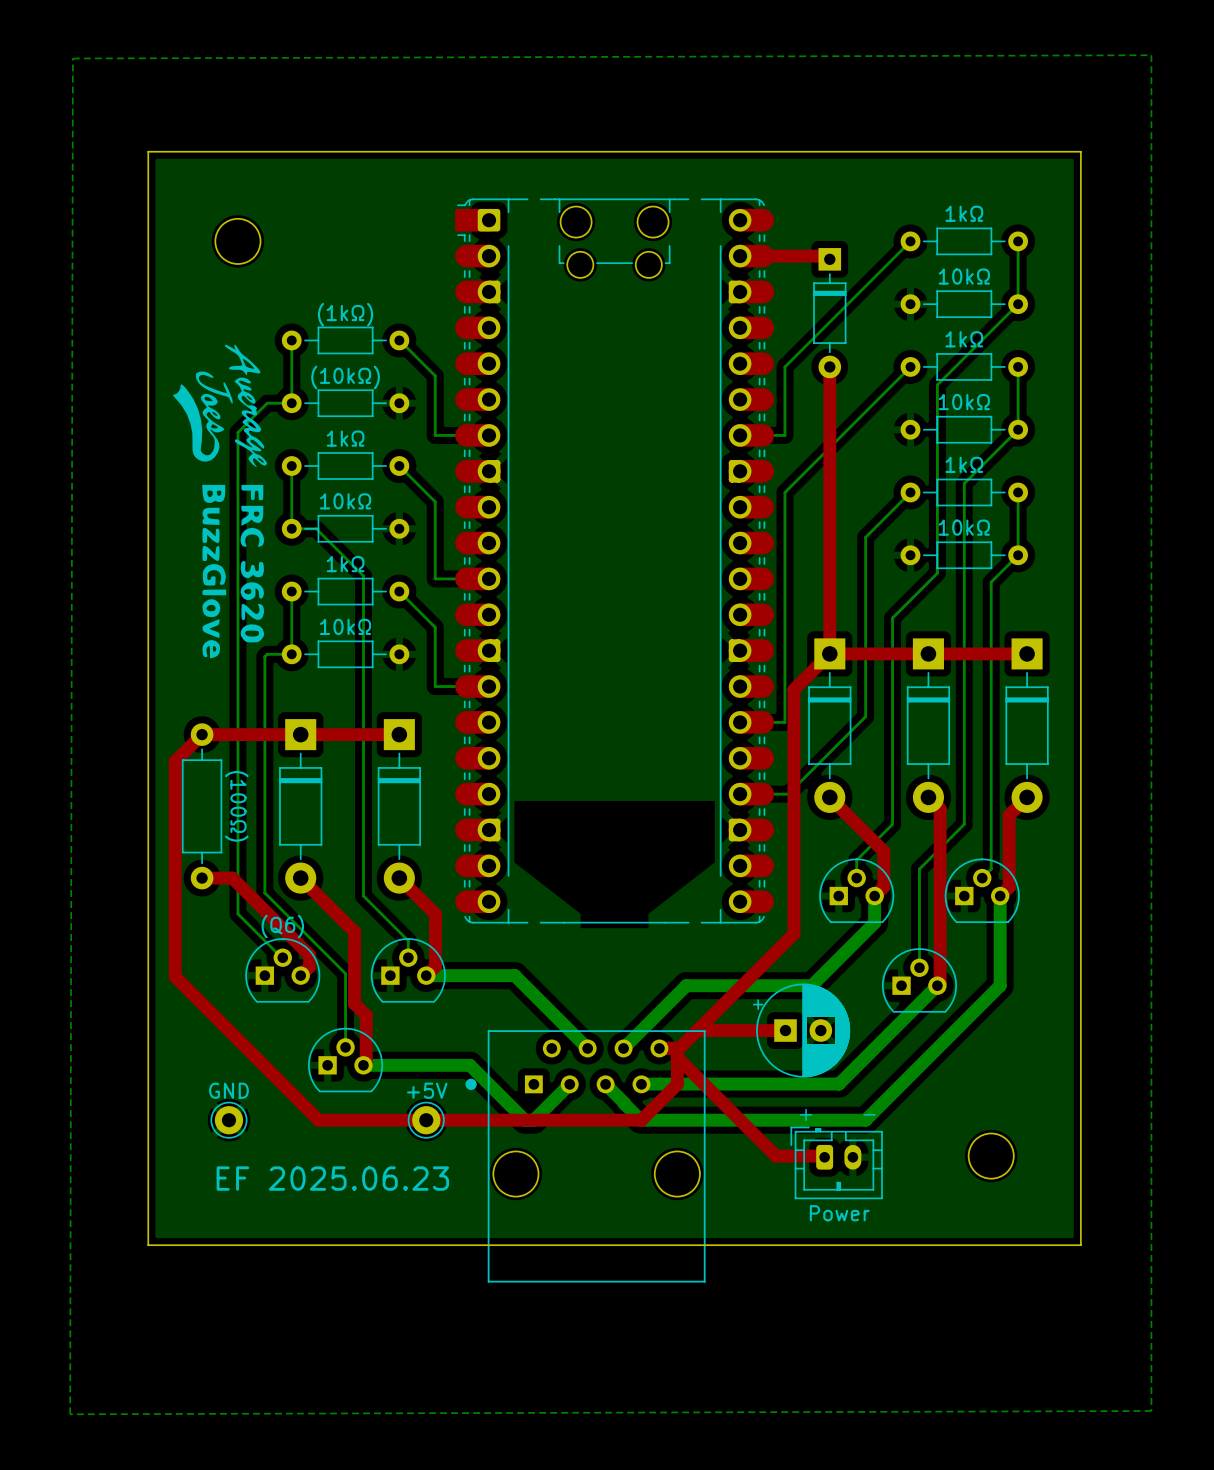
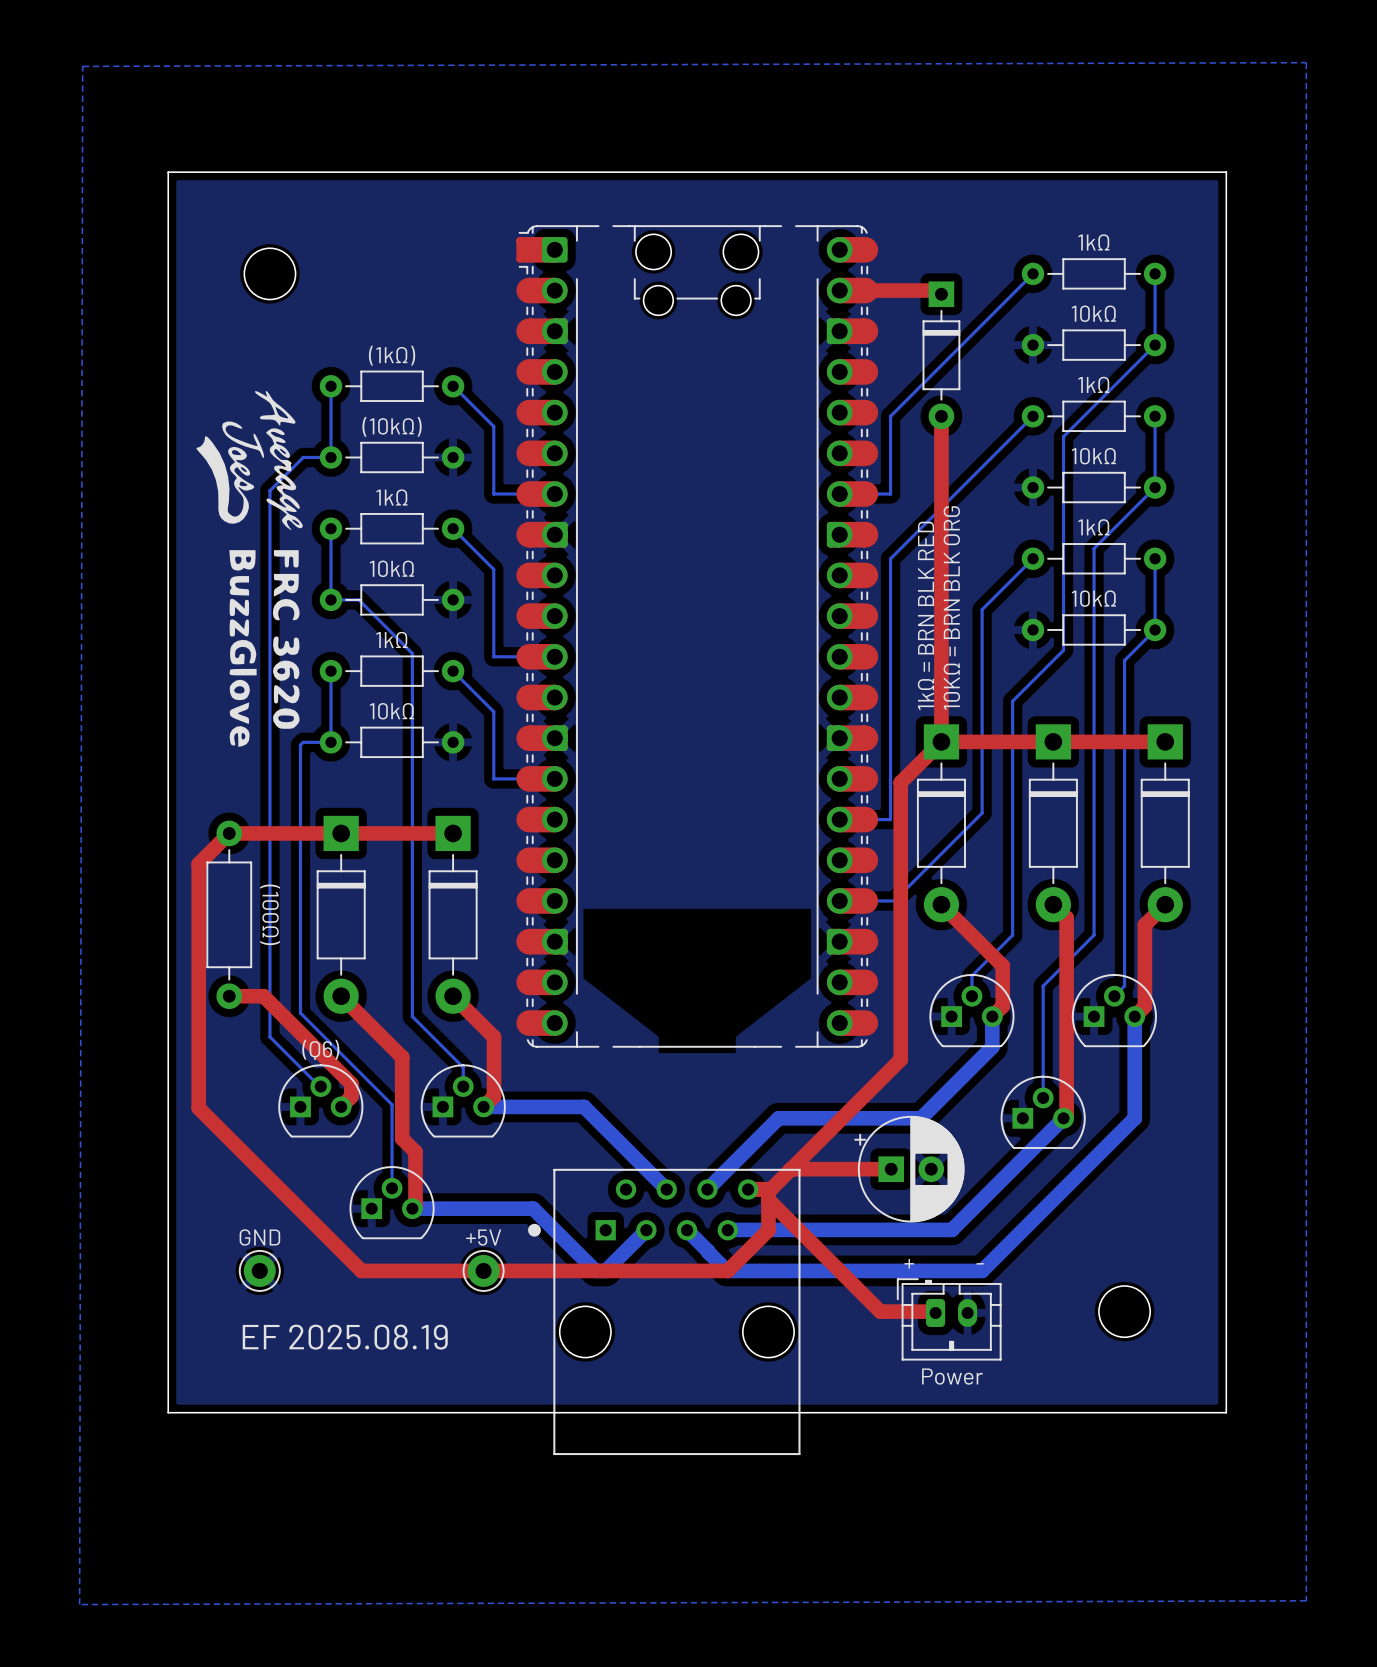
text: none -> 10KΩ = BRN BLK ORG (951, 608)
text: none -> 1kΩ = BRN BLK RED (925, 615)
text: EF 2025.06.23 (332, 1178) -> EF 2025.08.19 (345, 1337)

